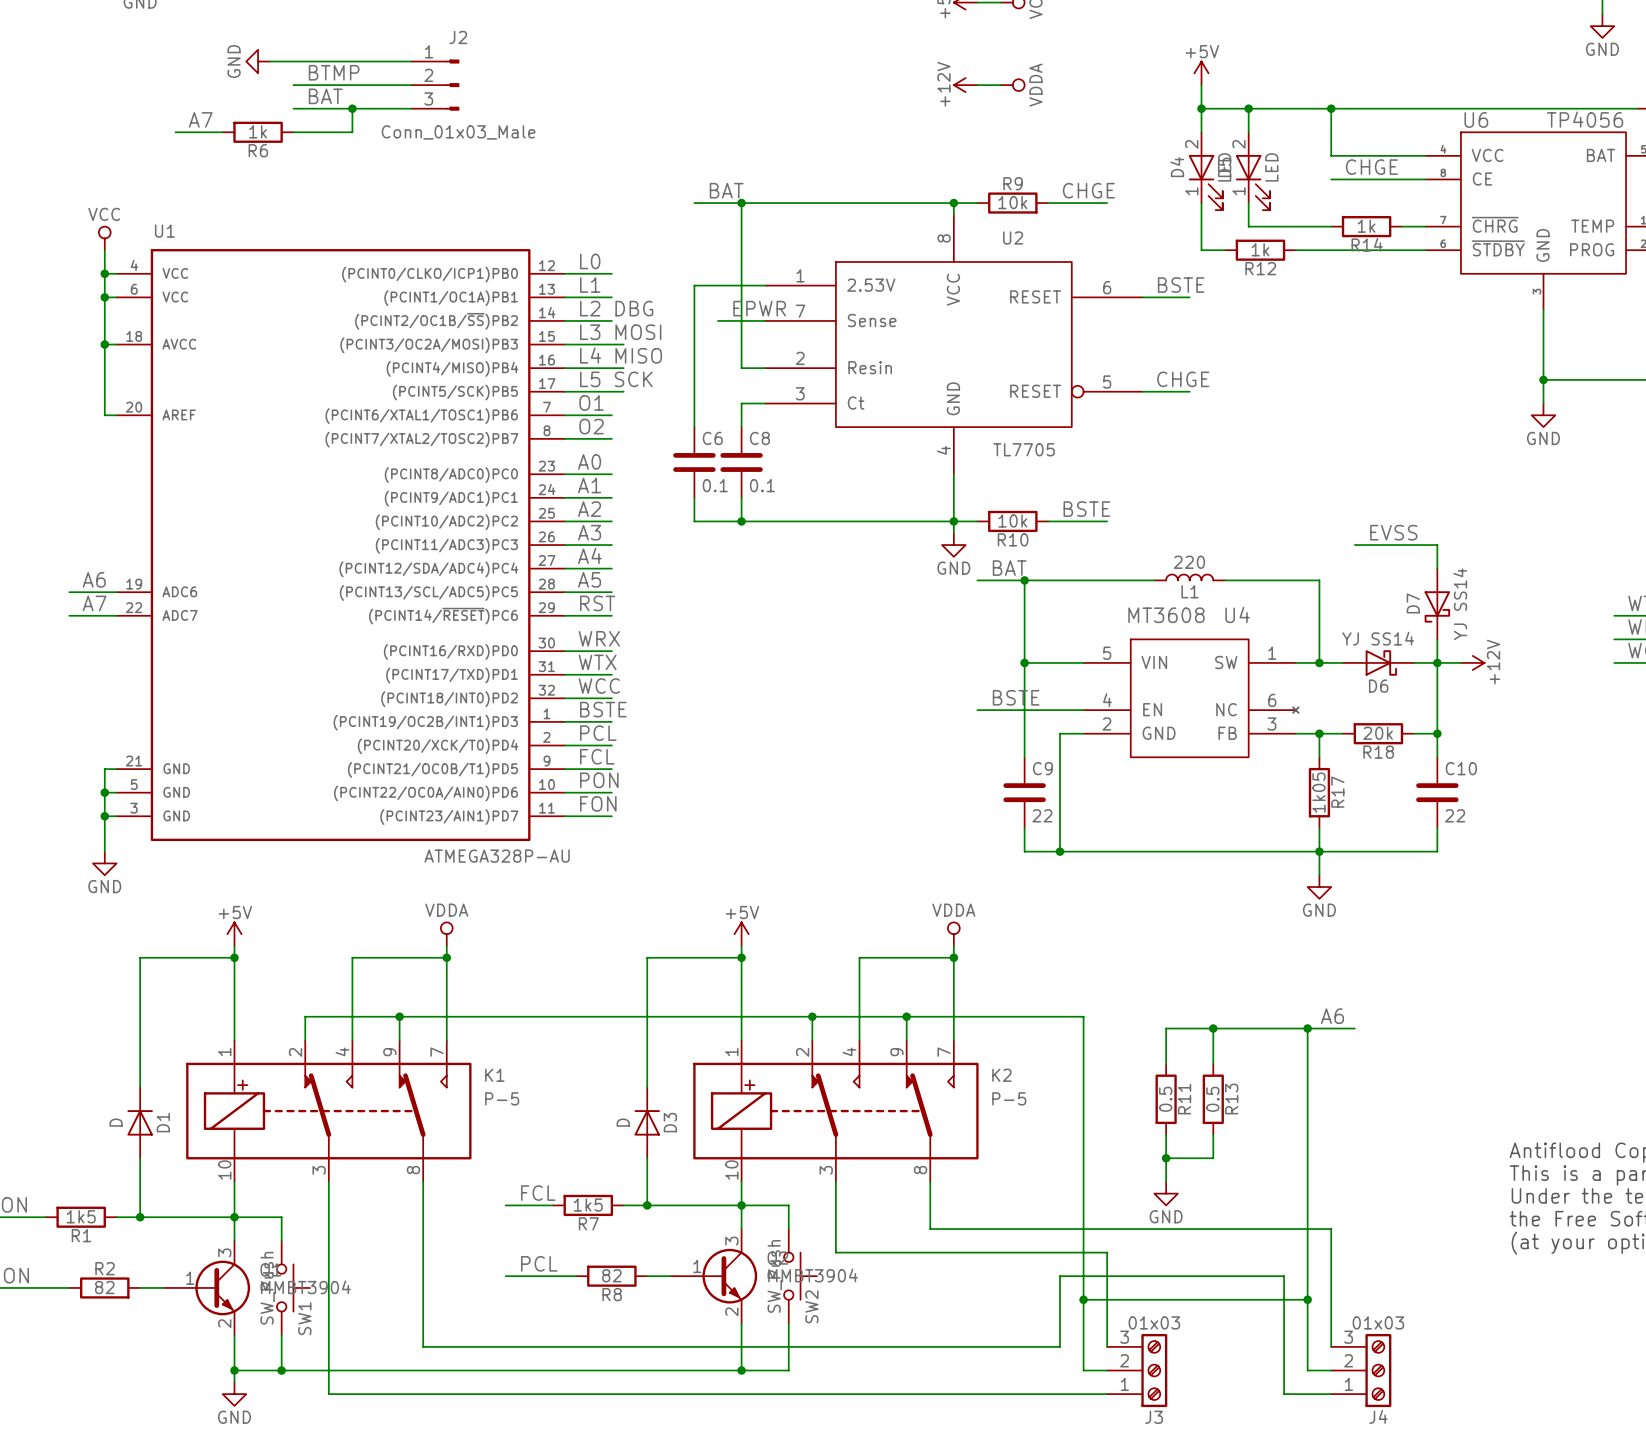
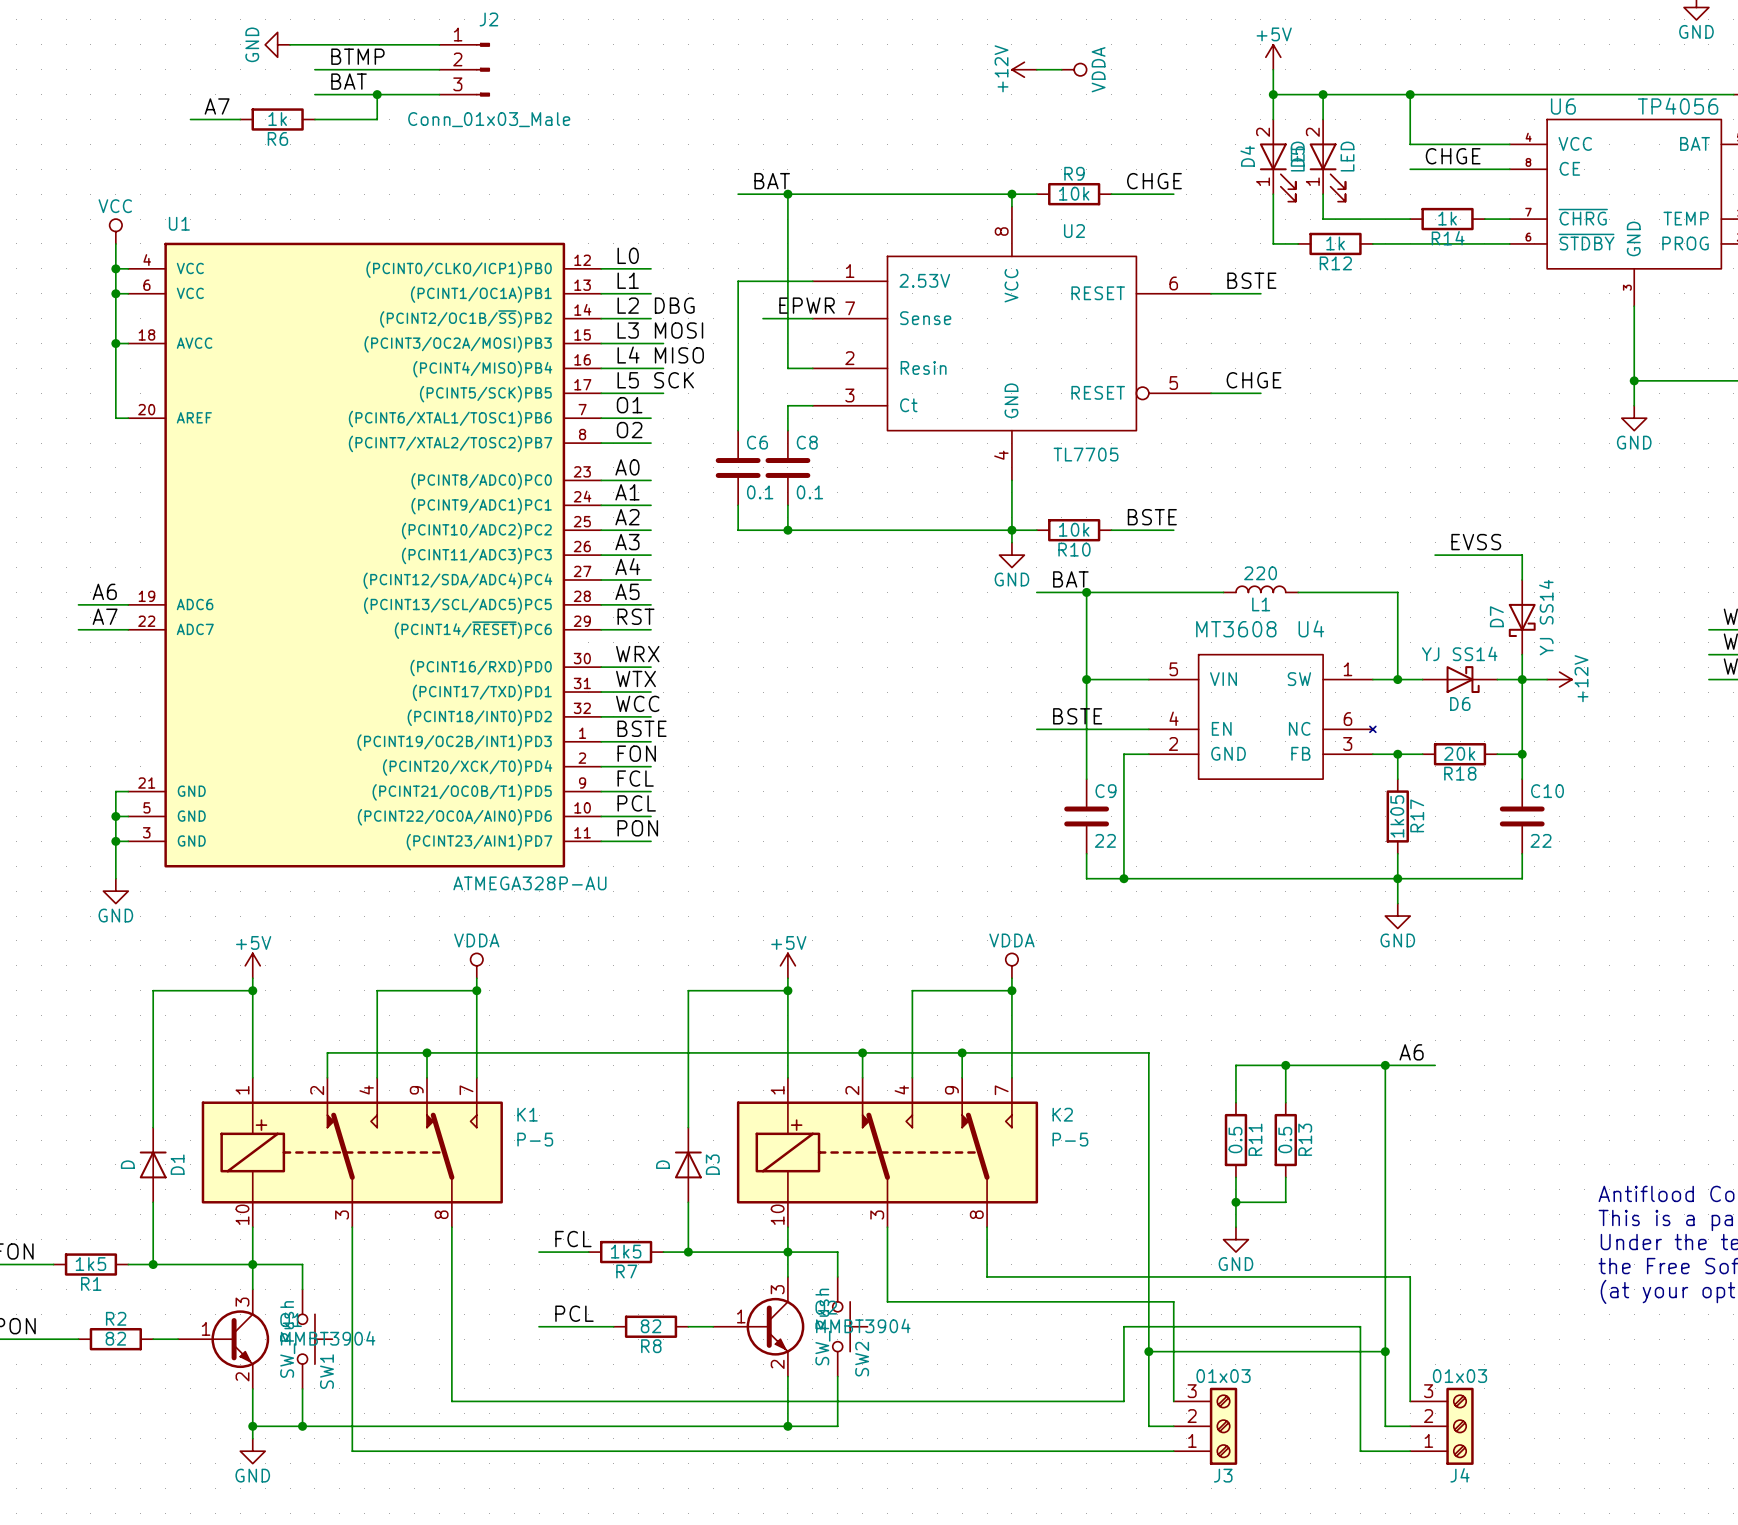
label: PCL (598, 733) -> FON (636, 753)
label: PON (599, 780) -> PCL (636, 803)
label: FON (598, 803) -> PON (637, 828)

